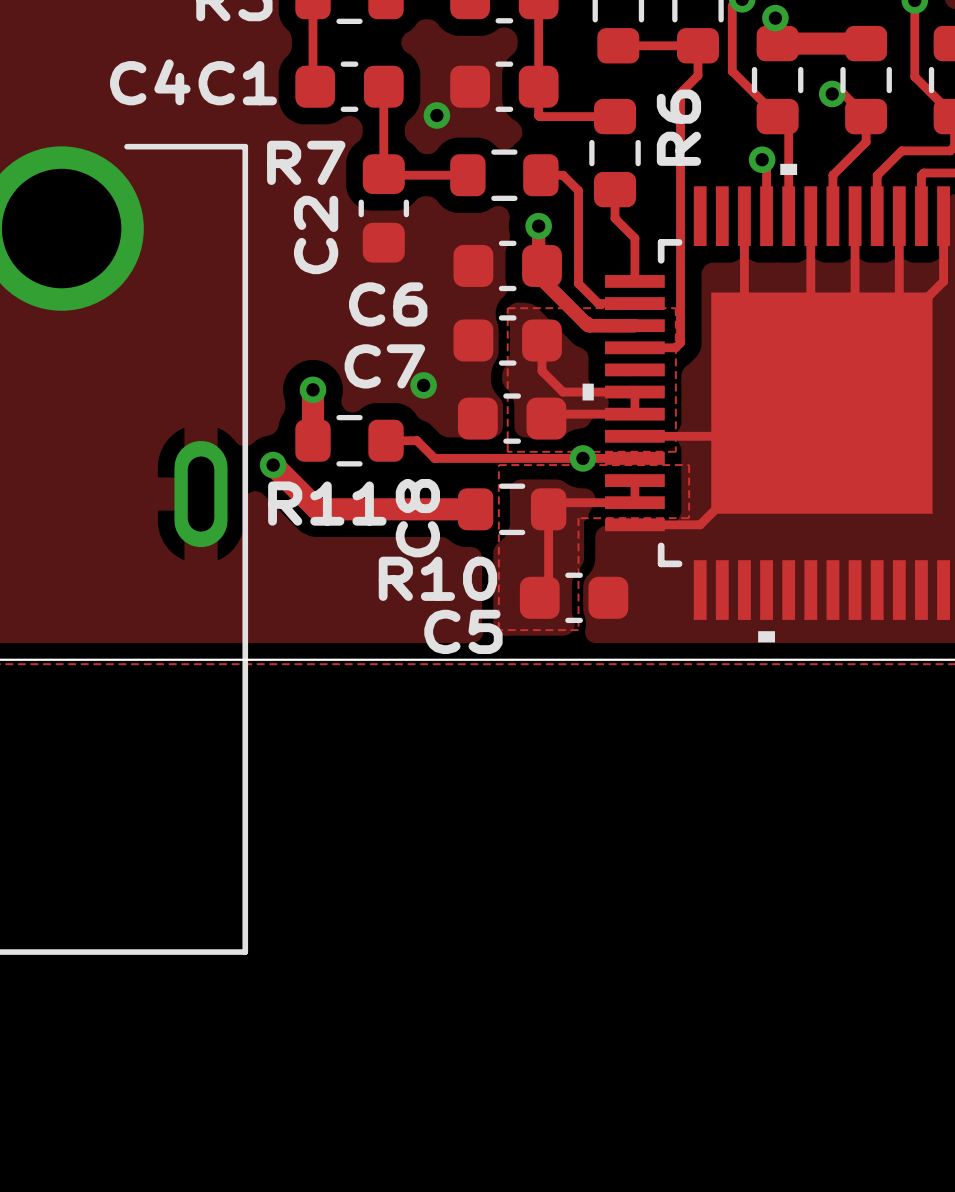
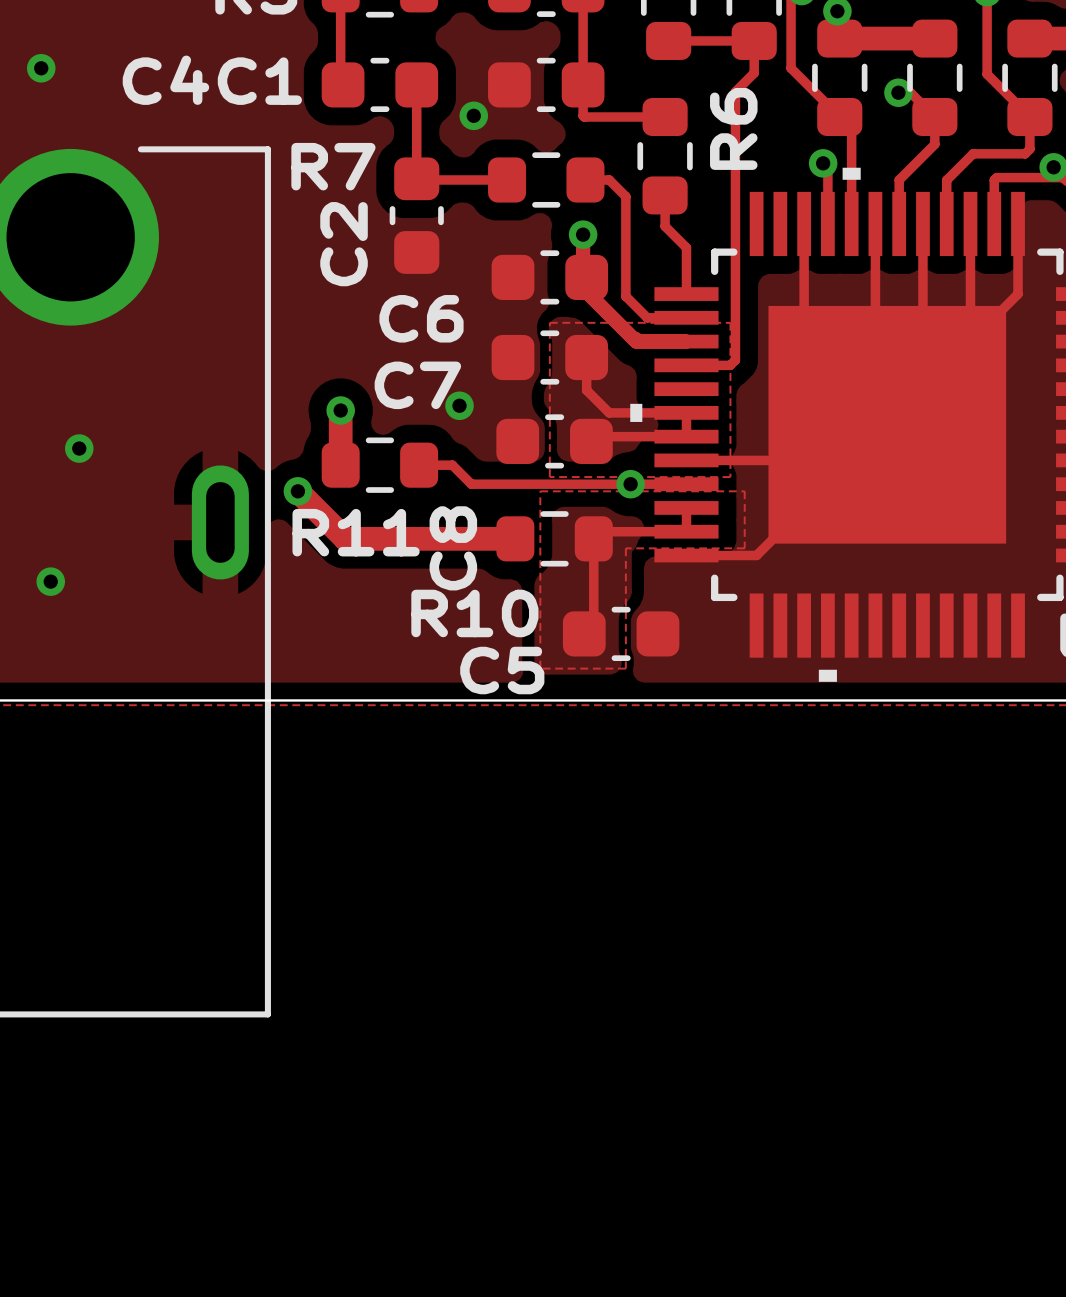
via: none -> (41, 68)
via: none -> (79, 448)
via: none -> (50, 581)

